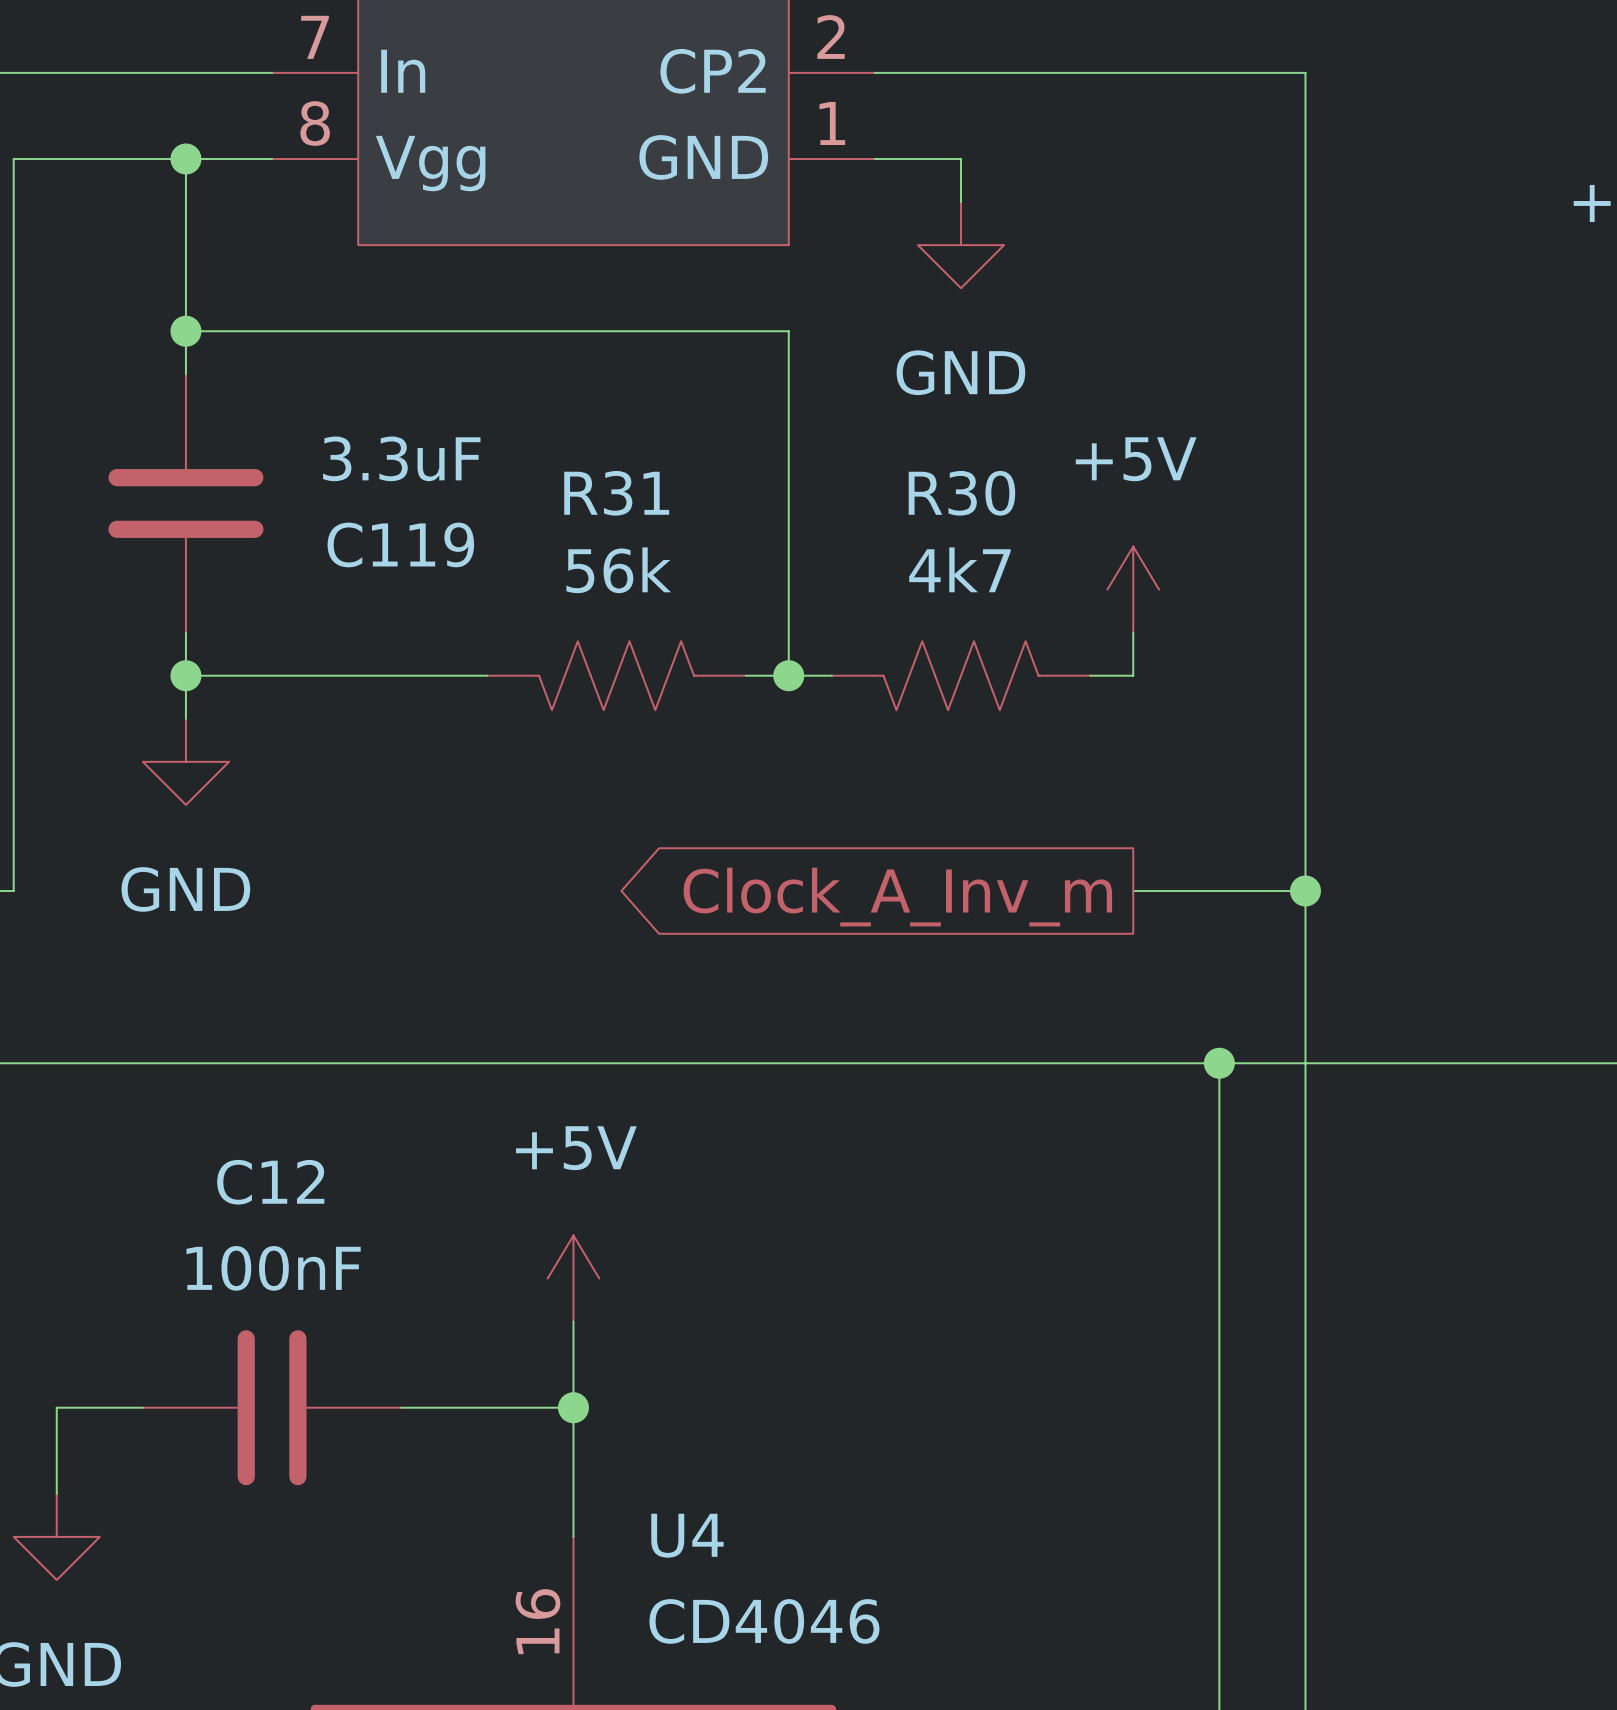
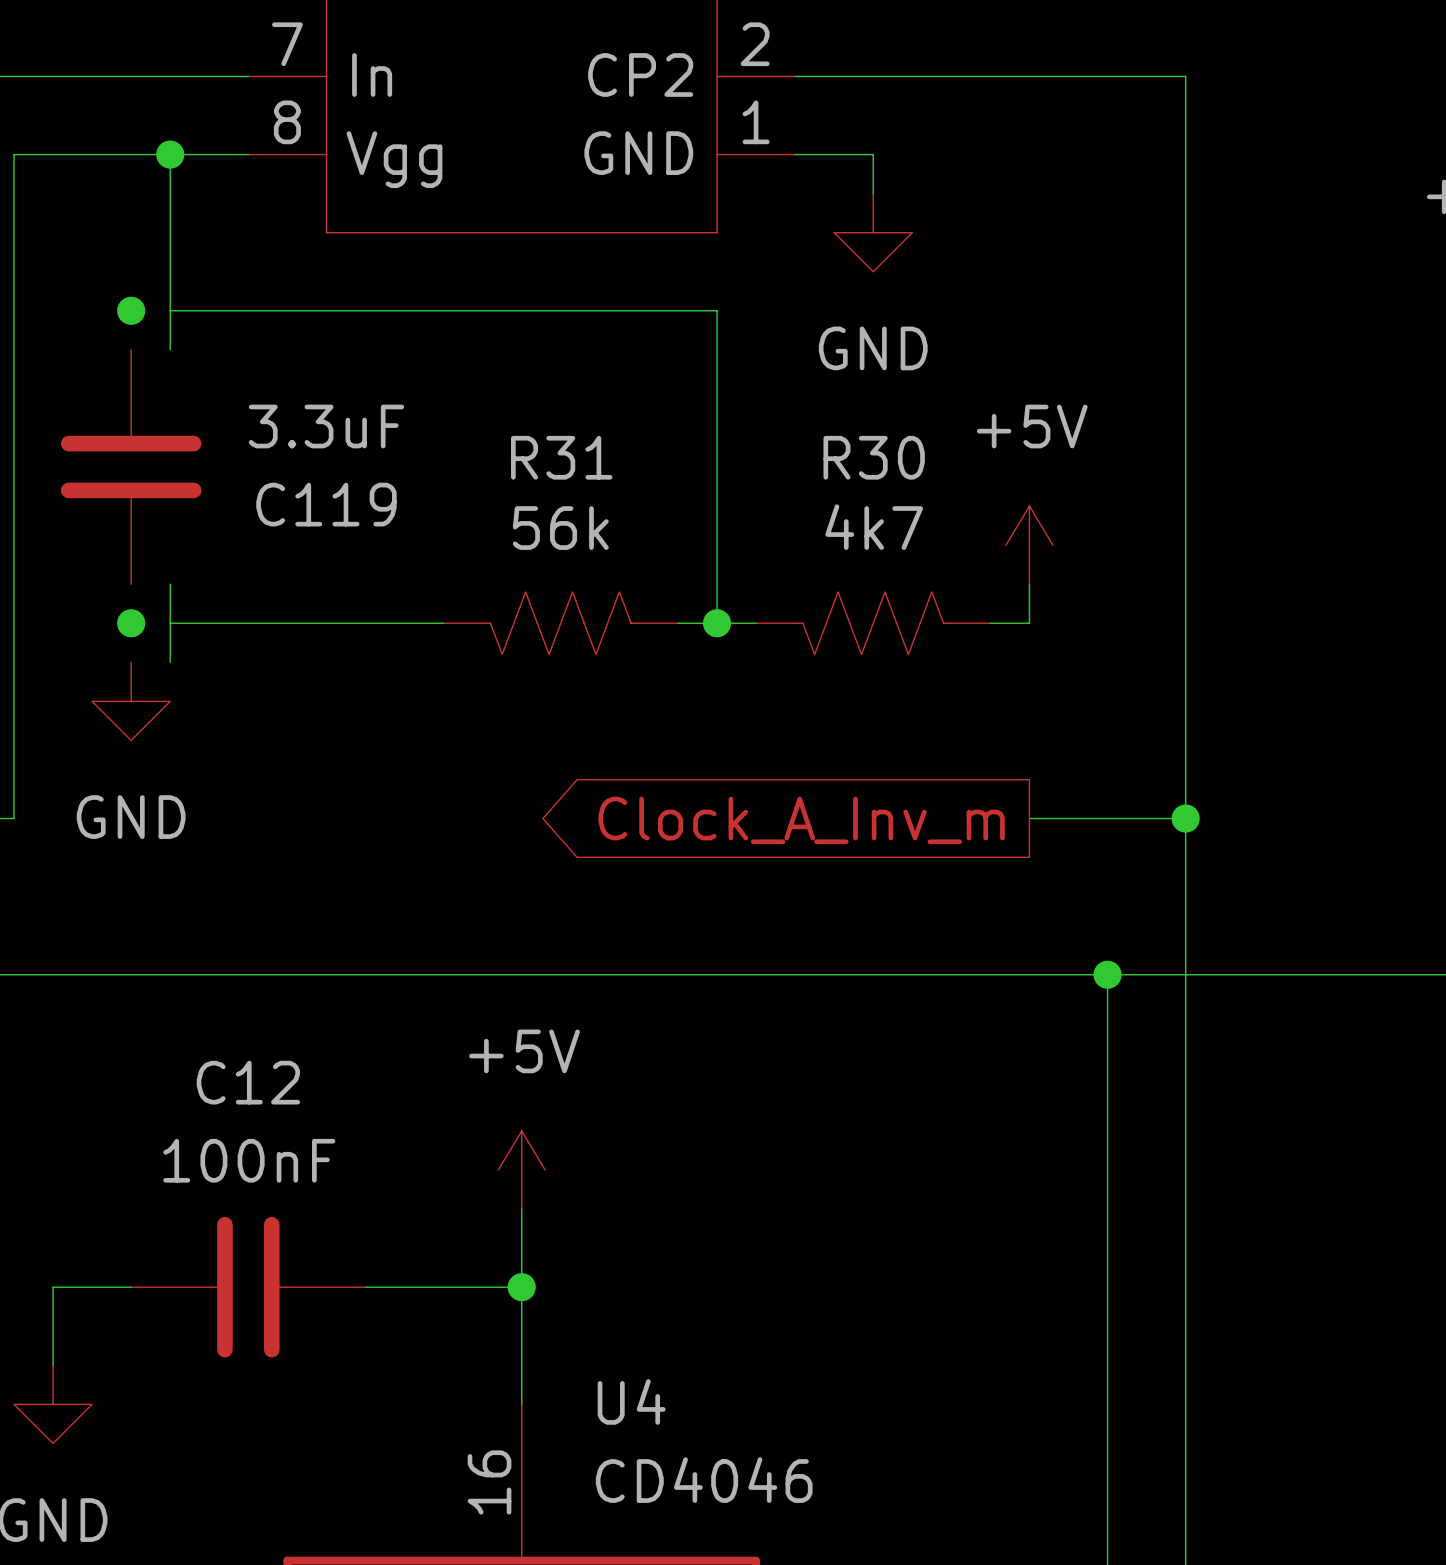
junction position: (185, 331) -> (131, 310)
C119 position: (185, 503) -> (131, 467)
junction position: (185, 675) -> (131, 623)
power symbol position: GND (185, 761) -> GND (131, 701)

